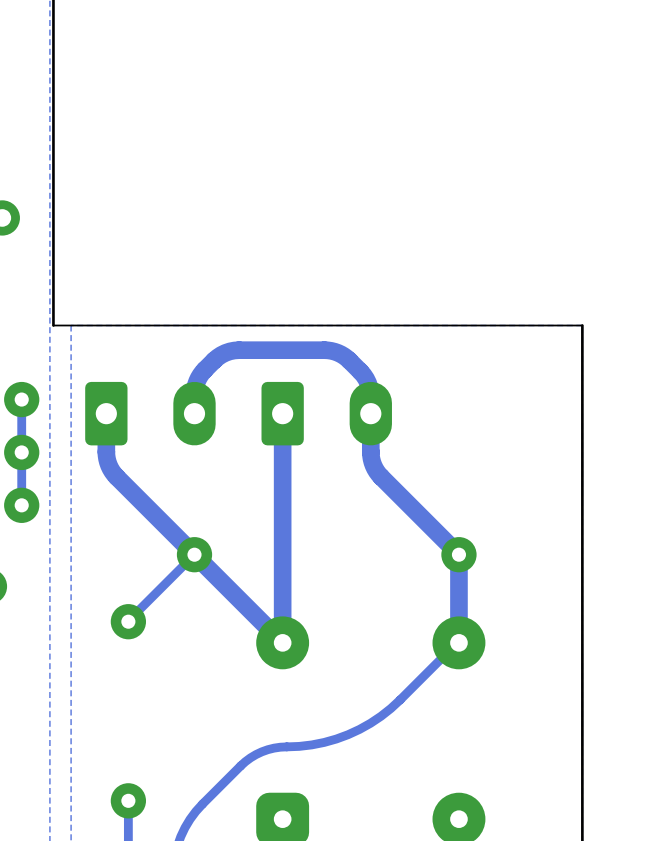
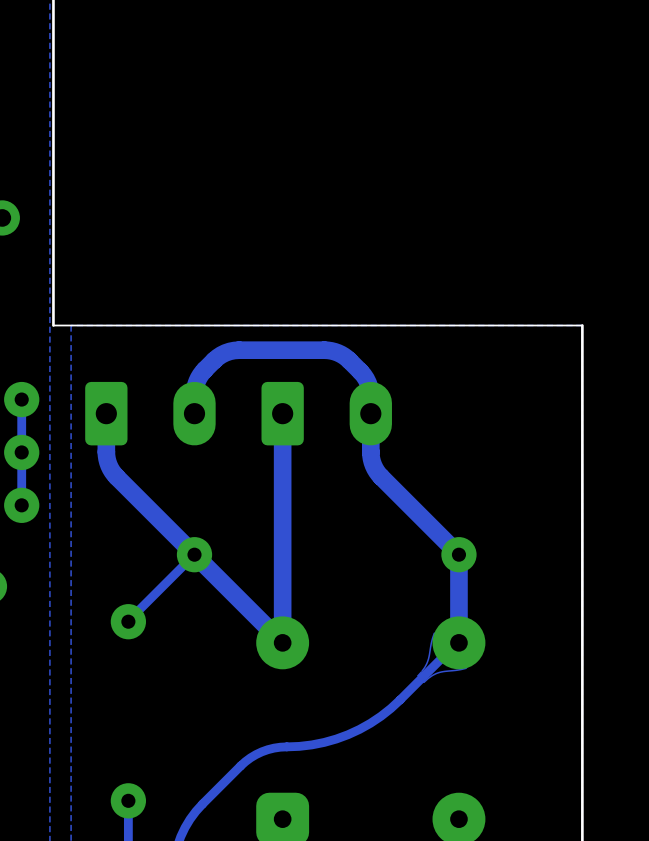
zone outline: none -> (434, 633) (427, 663) (417, 676) (423, 682) (436, 673) (466, 668) (468, 633) (434, 633)

